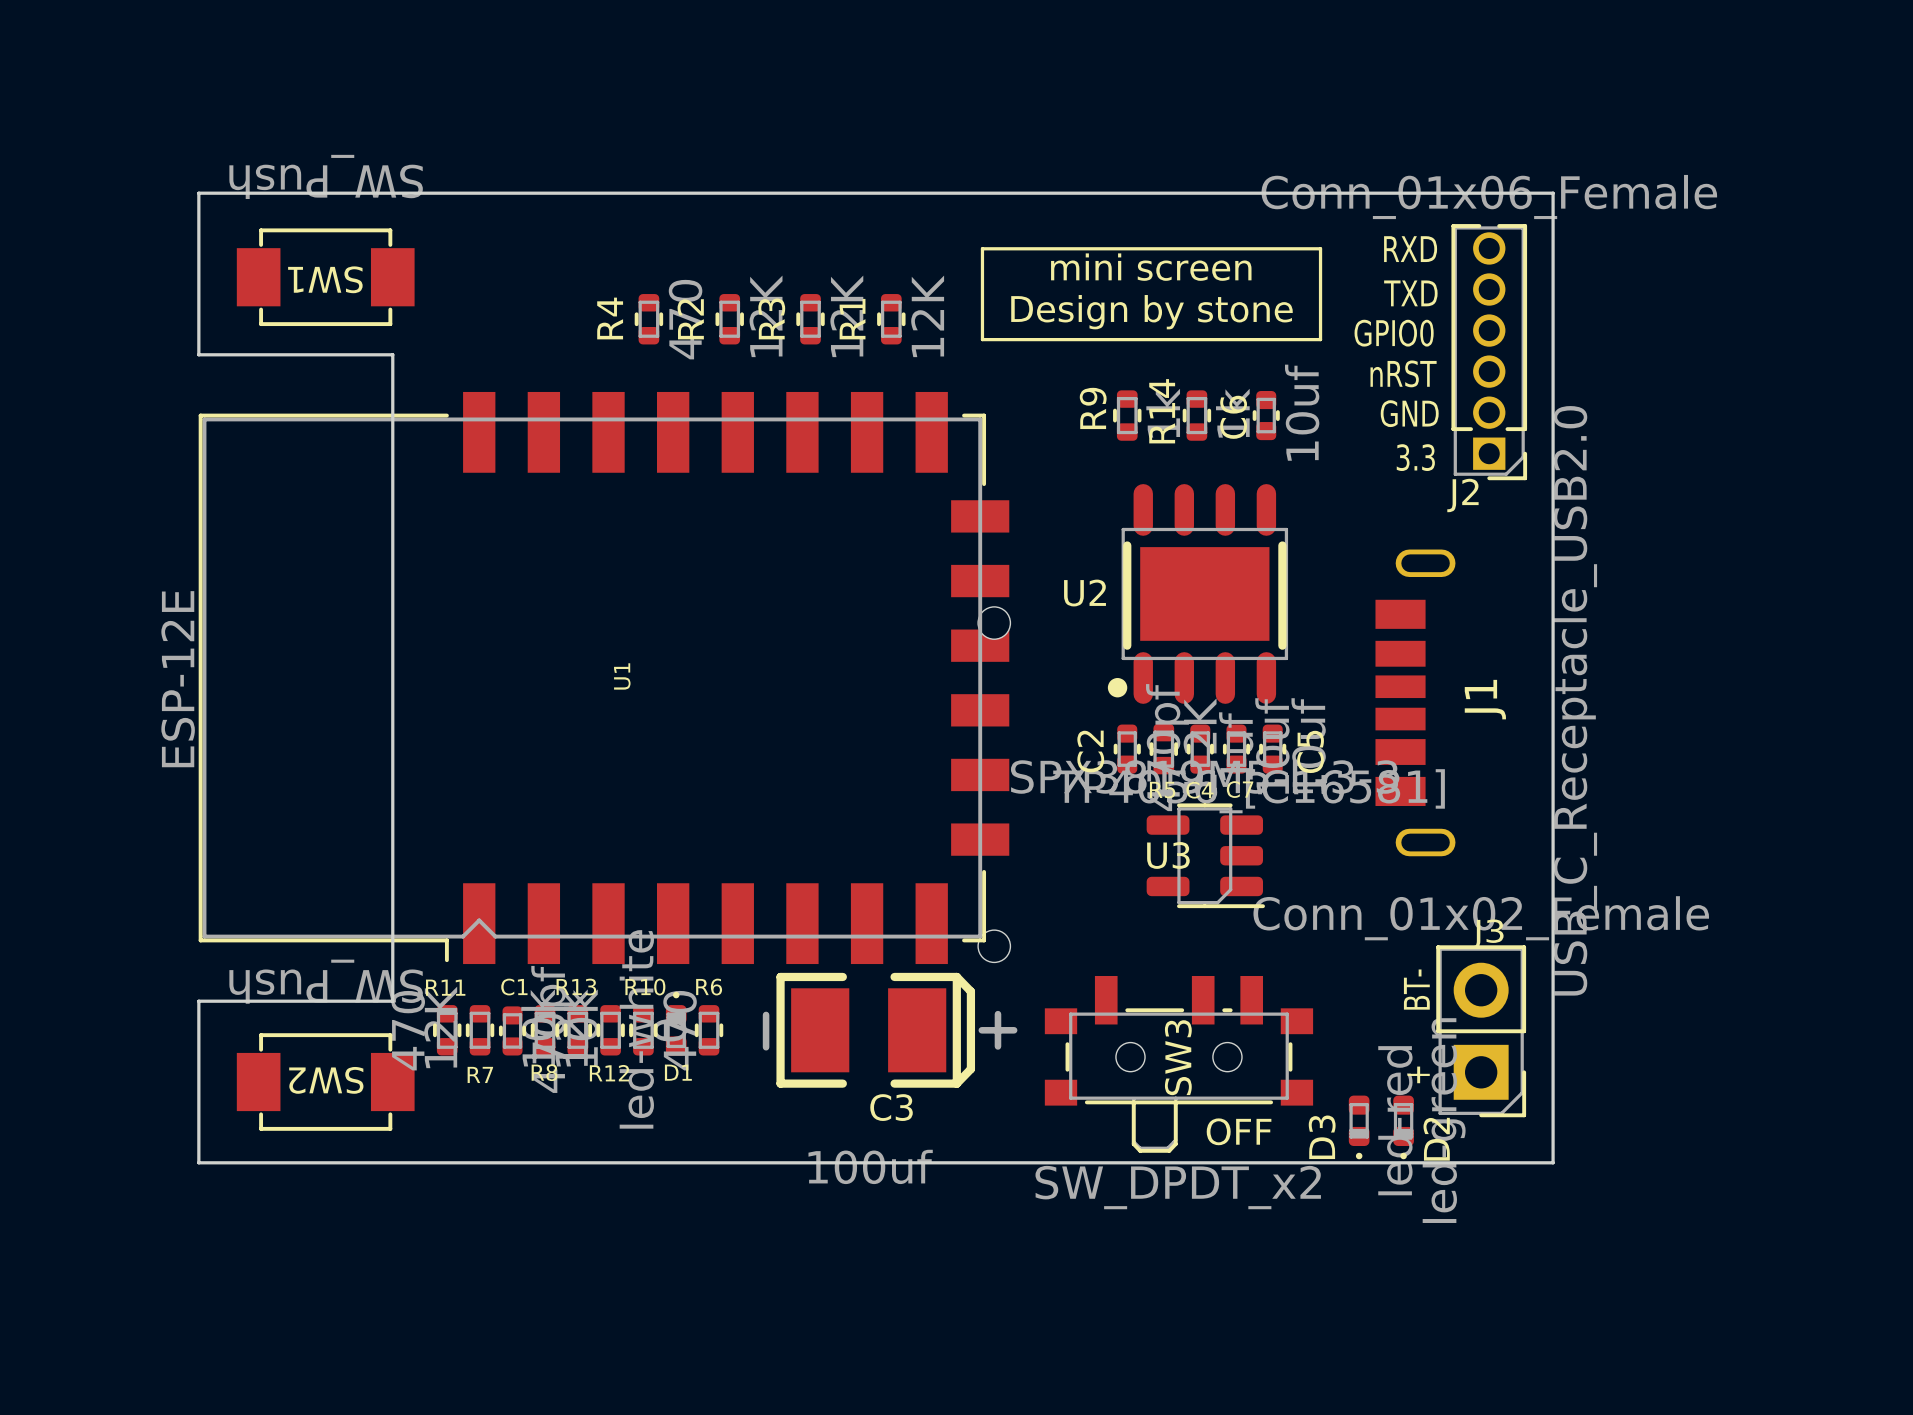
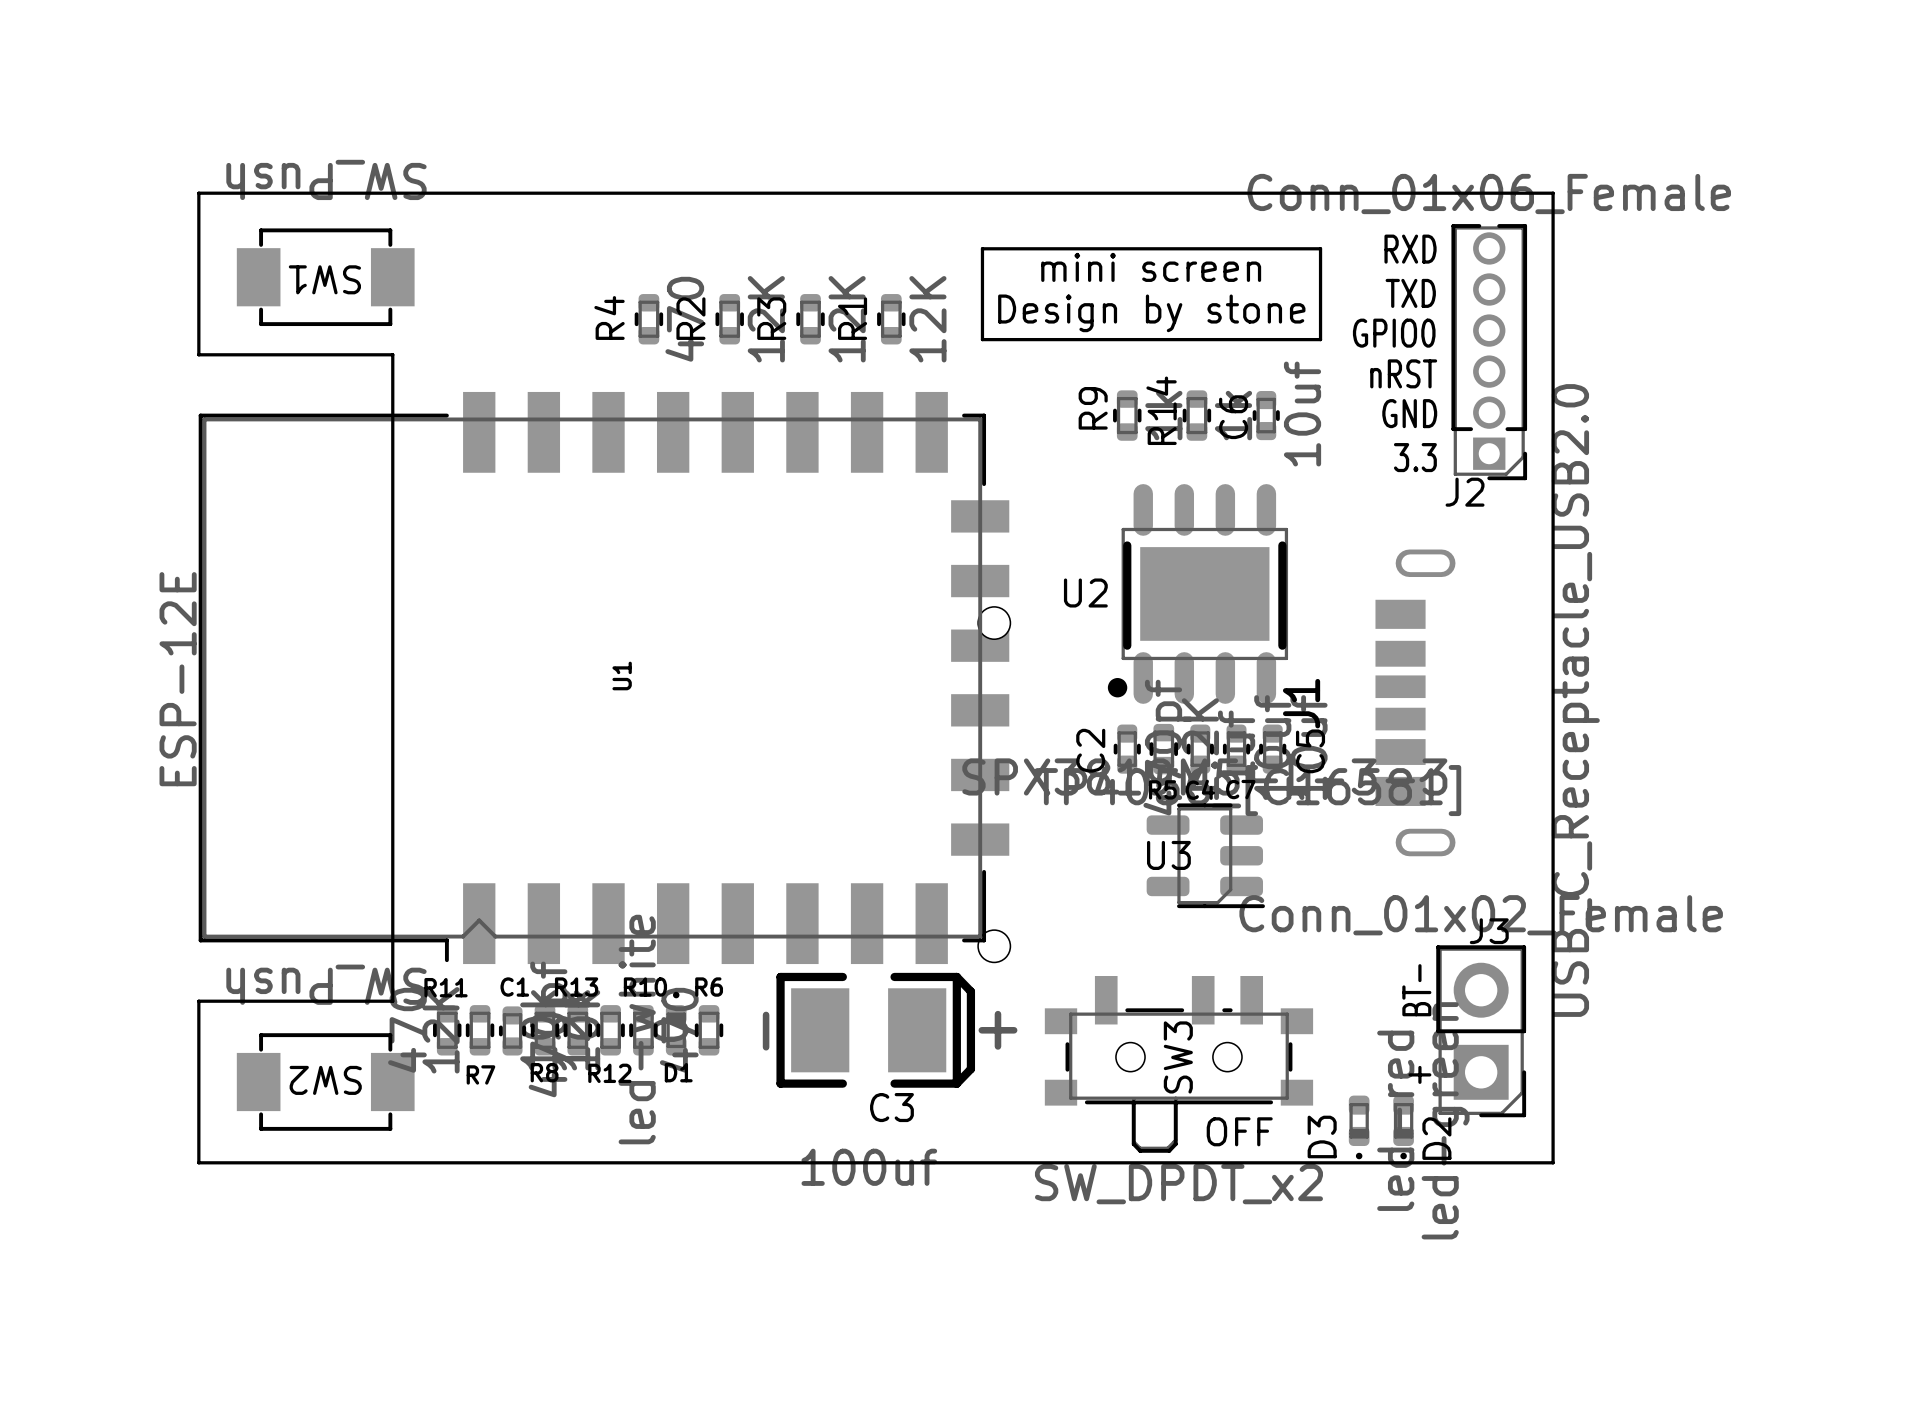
J1 name position: J1 (1485, 699) -> J1 (1301, 703)

